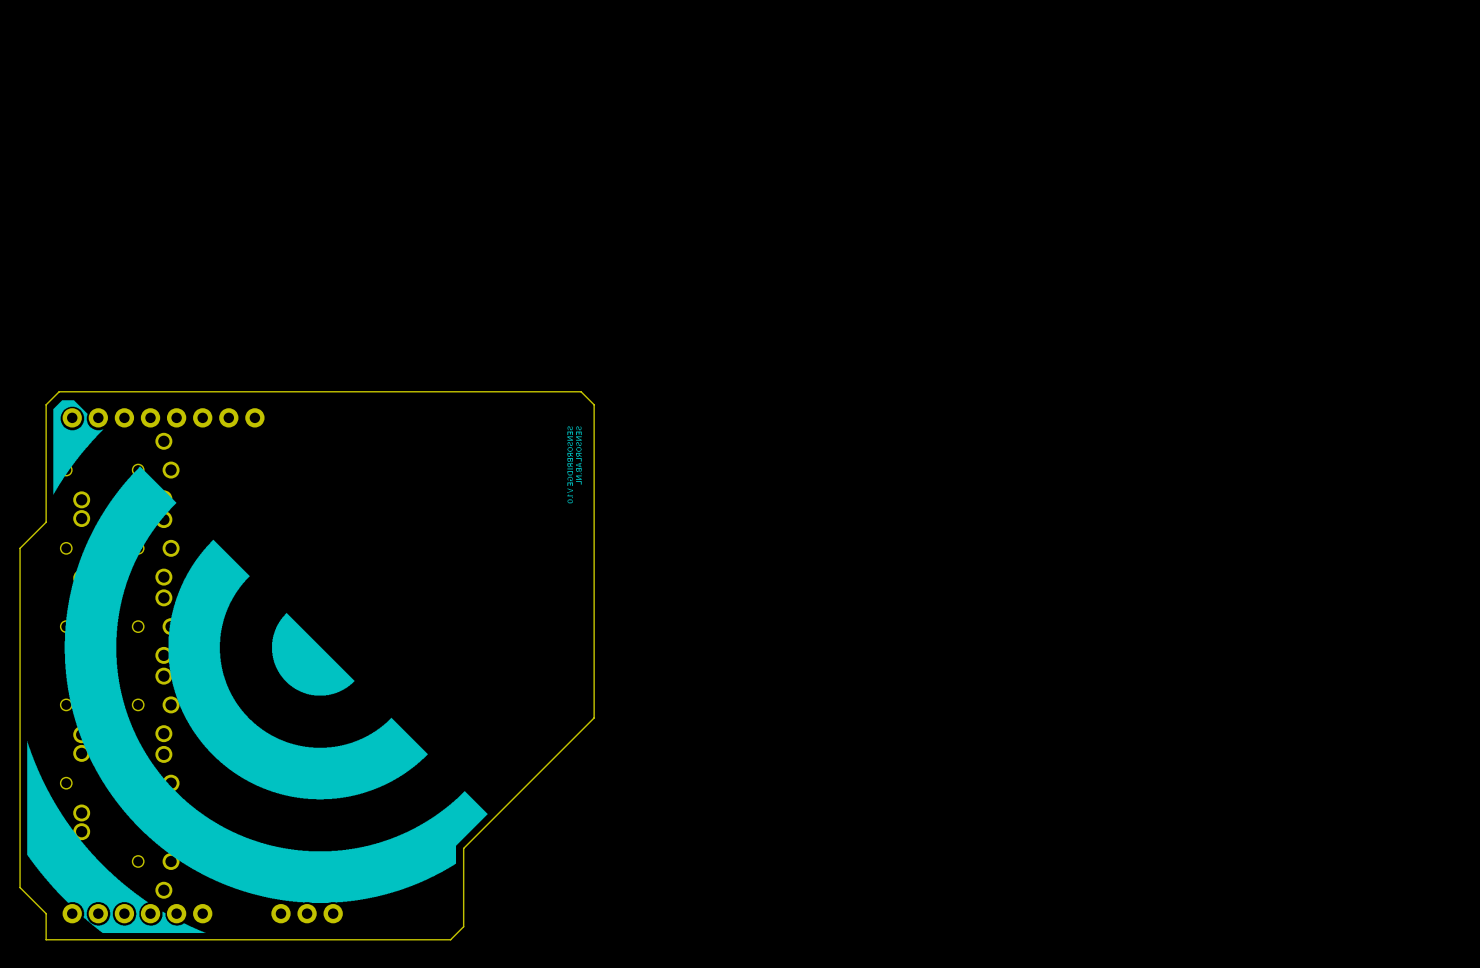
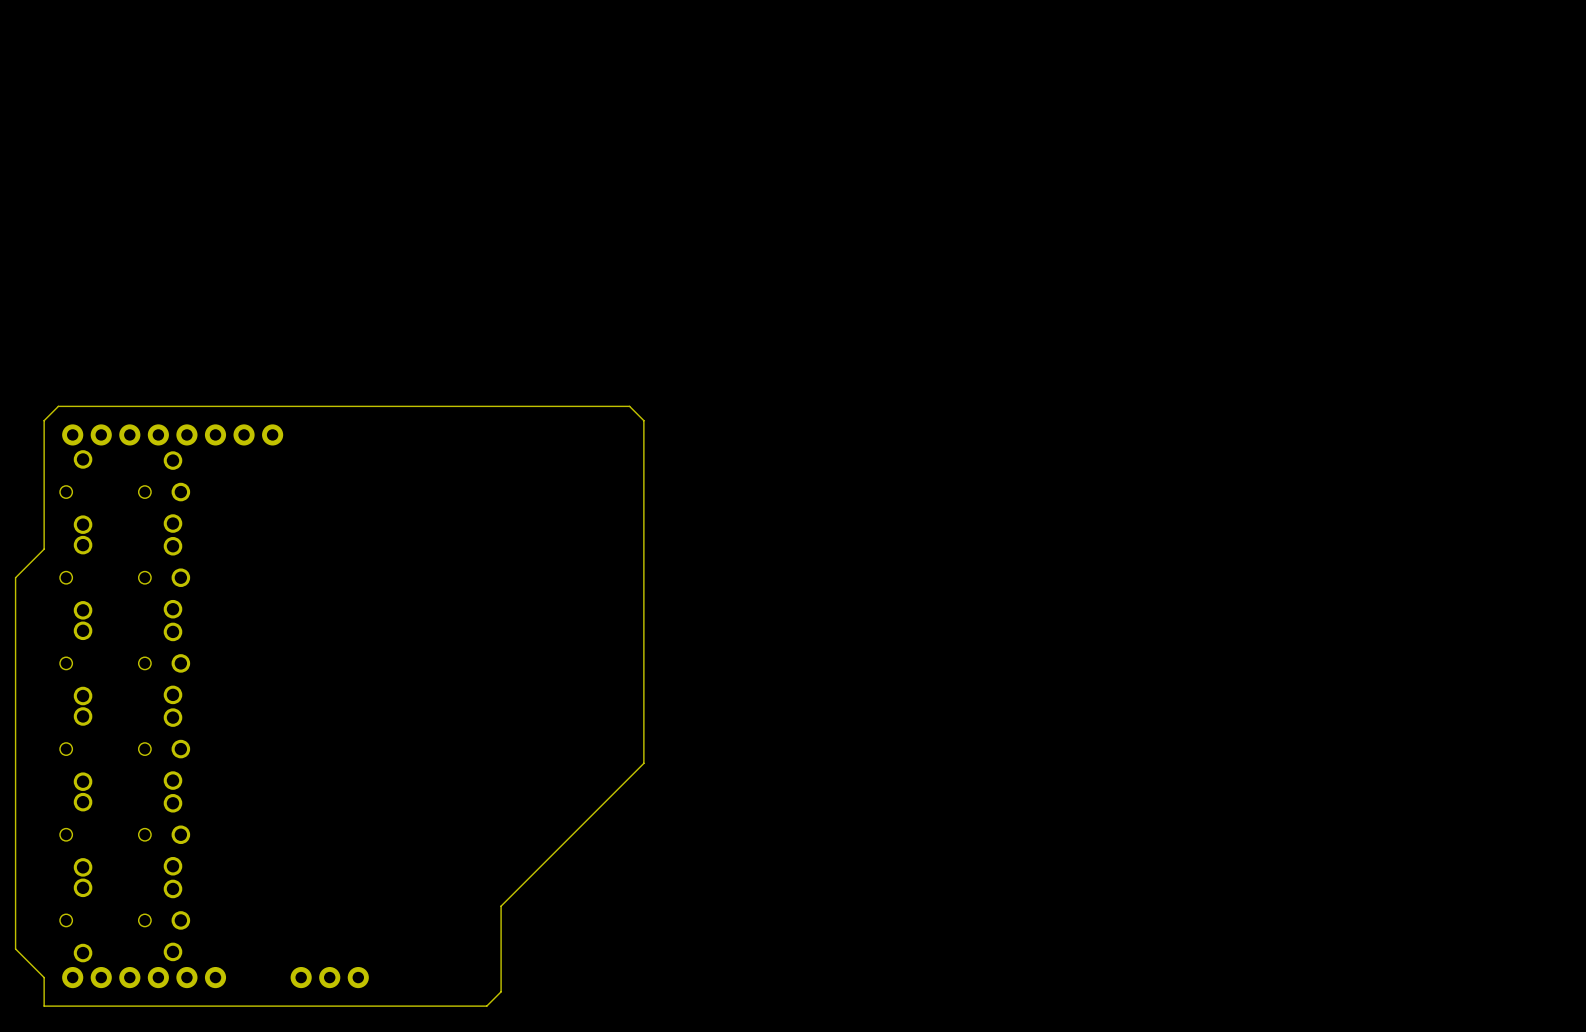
drawing: [53, 400, 104, 495] -> none
drawing: [567, 426, 582, 504] -> none
drawing: [64, 466, 488, 904] -> none
drawing: [168, 539, 428, 800] -> none
drawing: [272, 612, 355, 696] -> none
drawing: [27, 741, 206, 934] -> none

